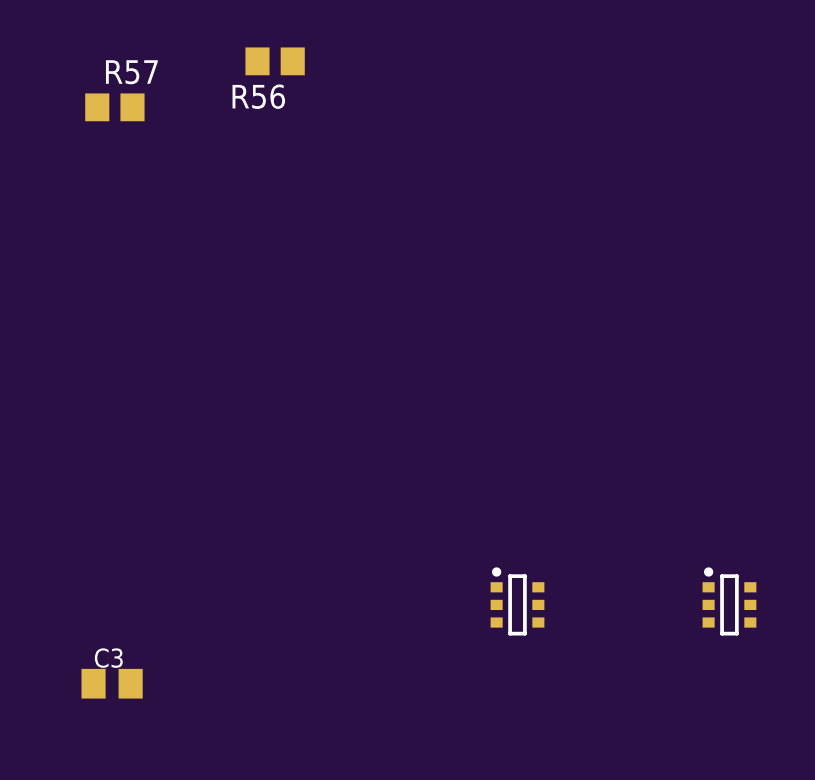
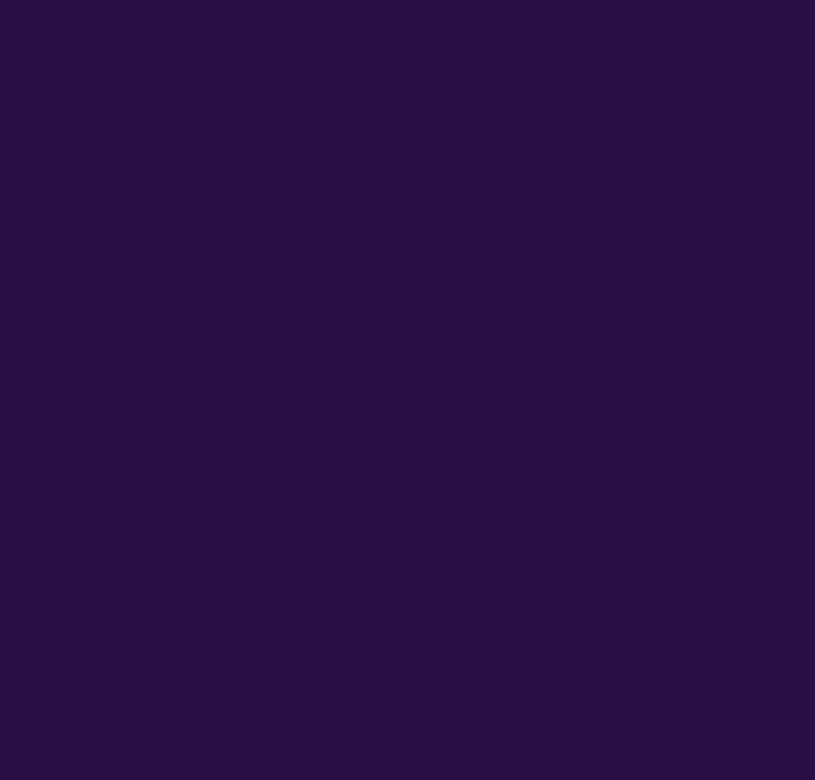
R56: (275, 61) -> none
R57: (114, 107) -> none
part: (517, 601) -> none
part: (729, 601) -> none
C3: (112, 683) -> none

